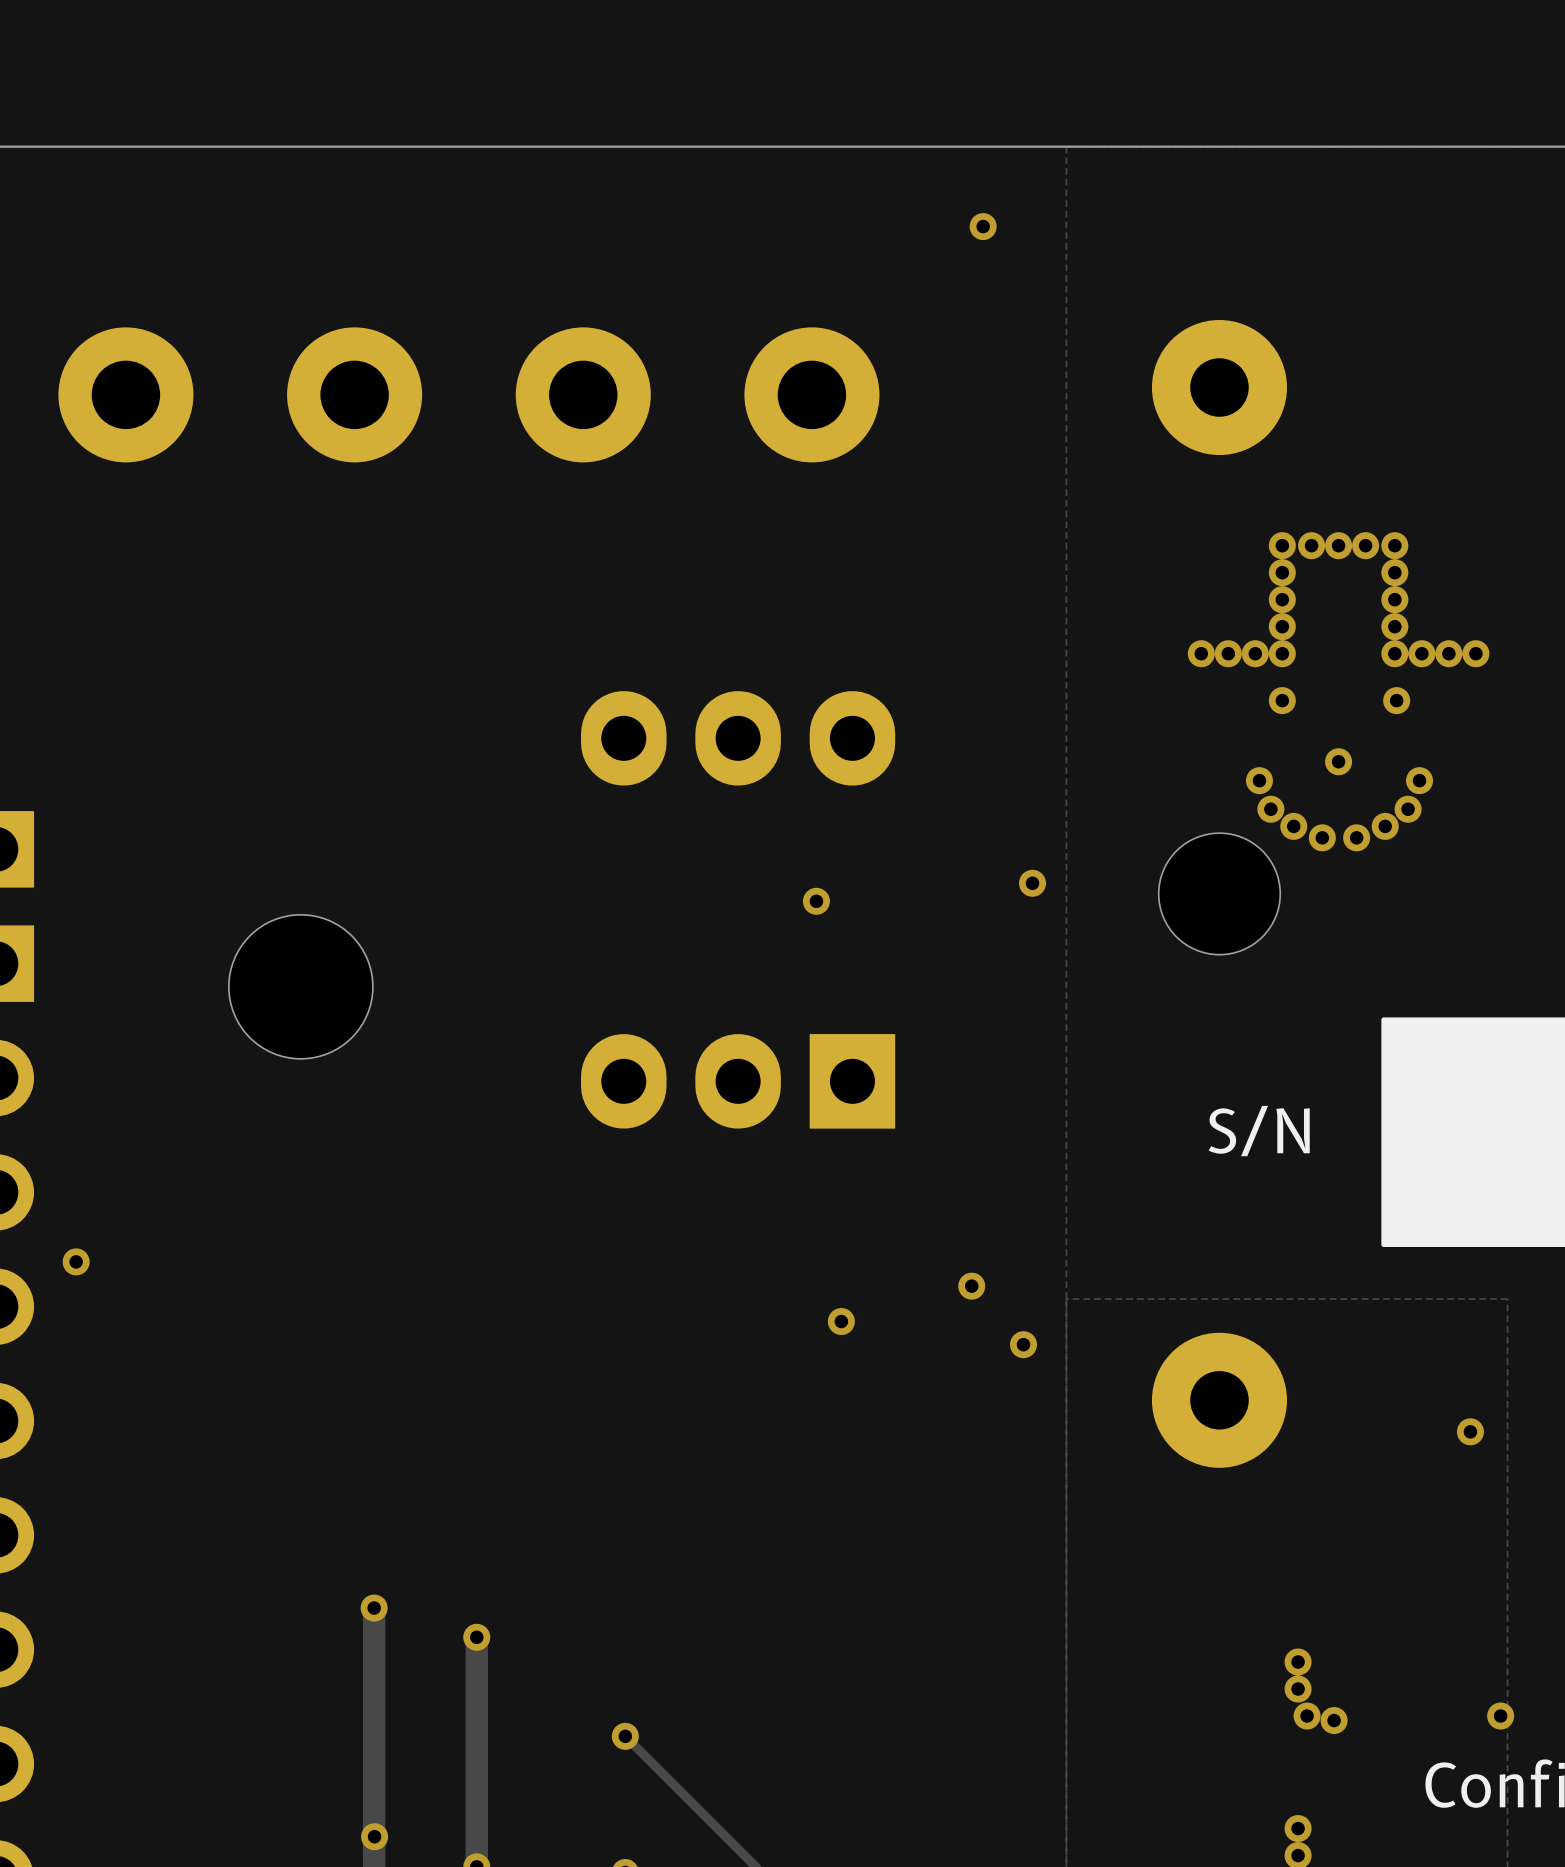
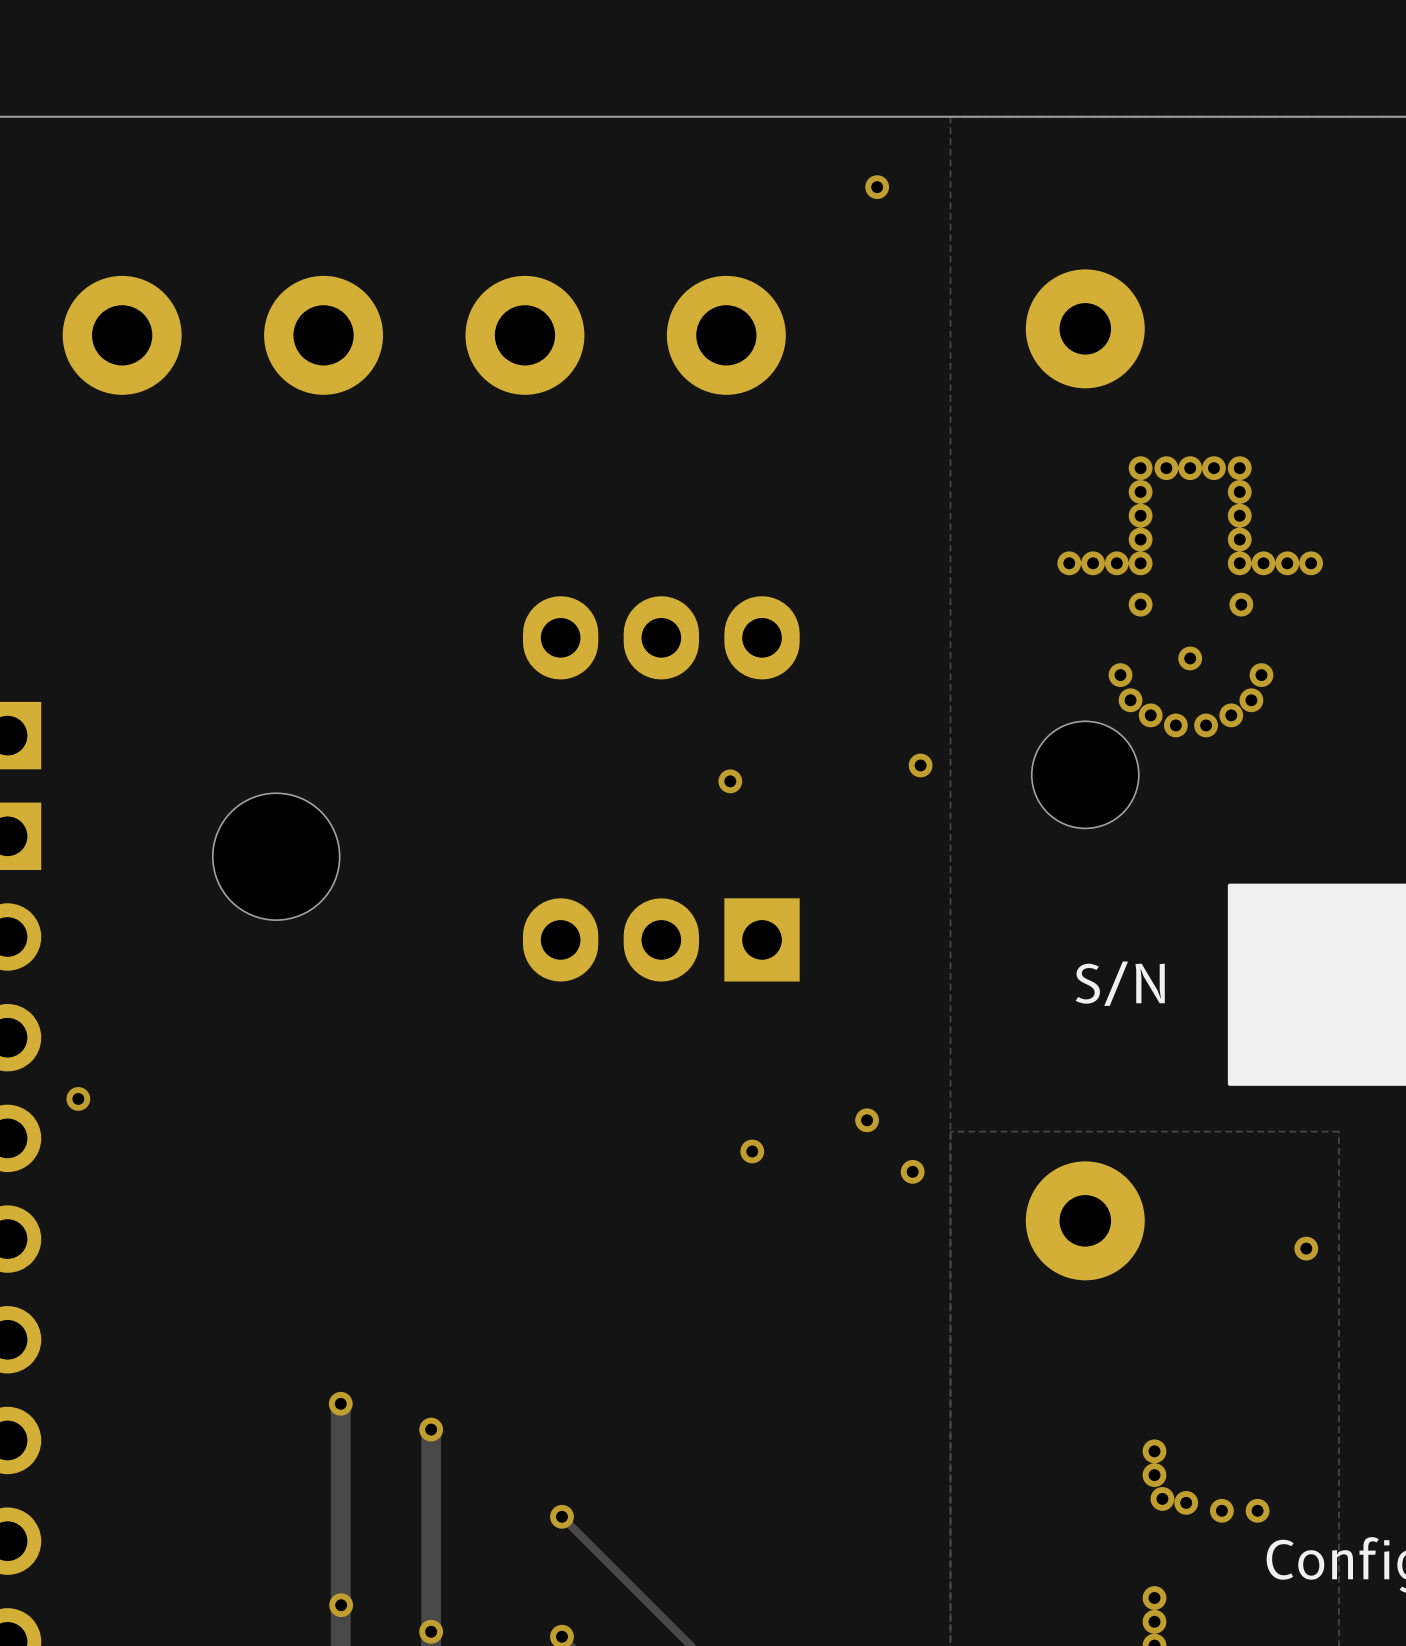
via: (1500, 1716) -> none
via: none -> (1221, 1510)
via: none -> (1257, 1510)

